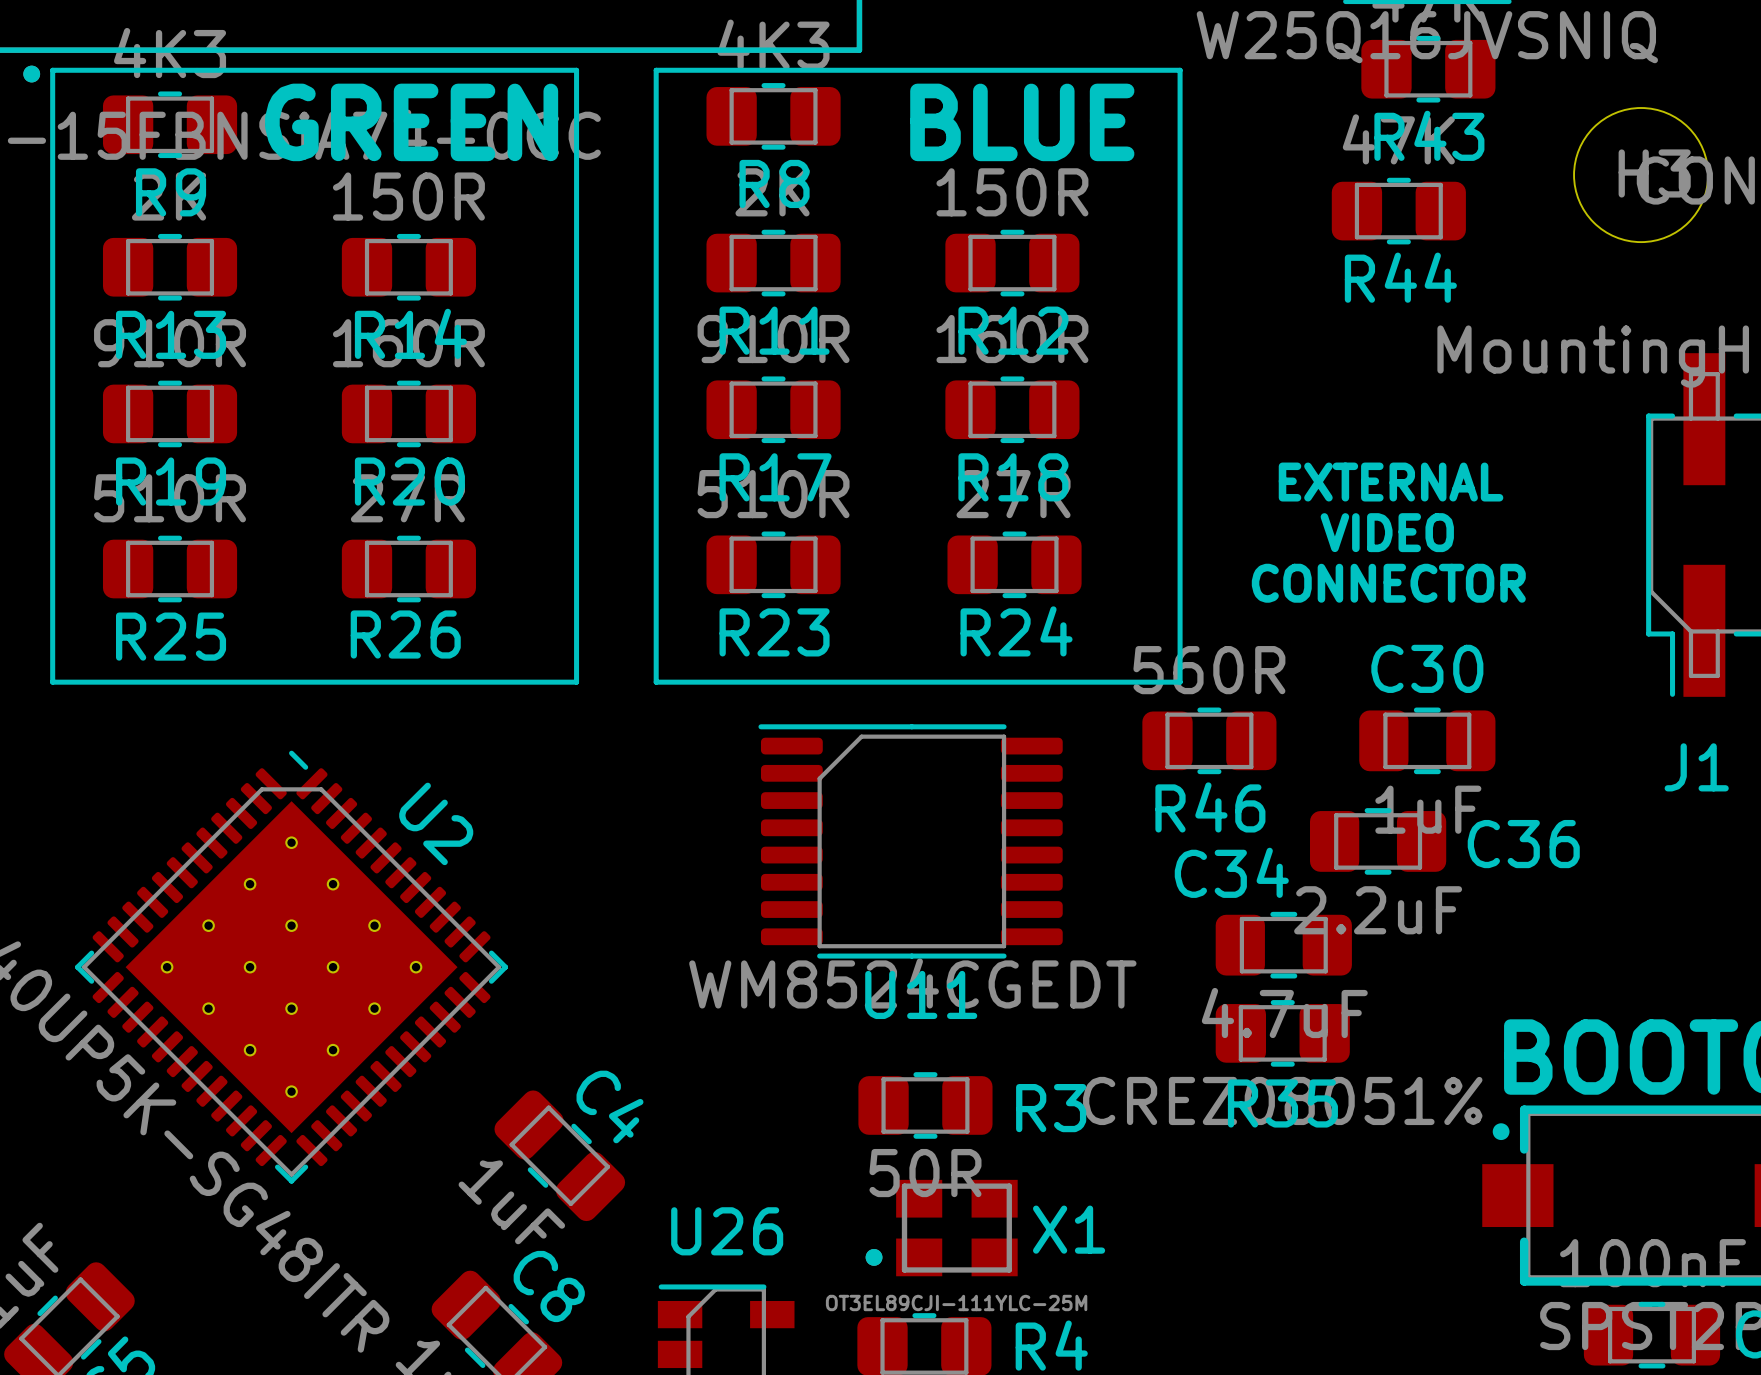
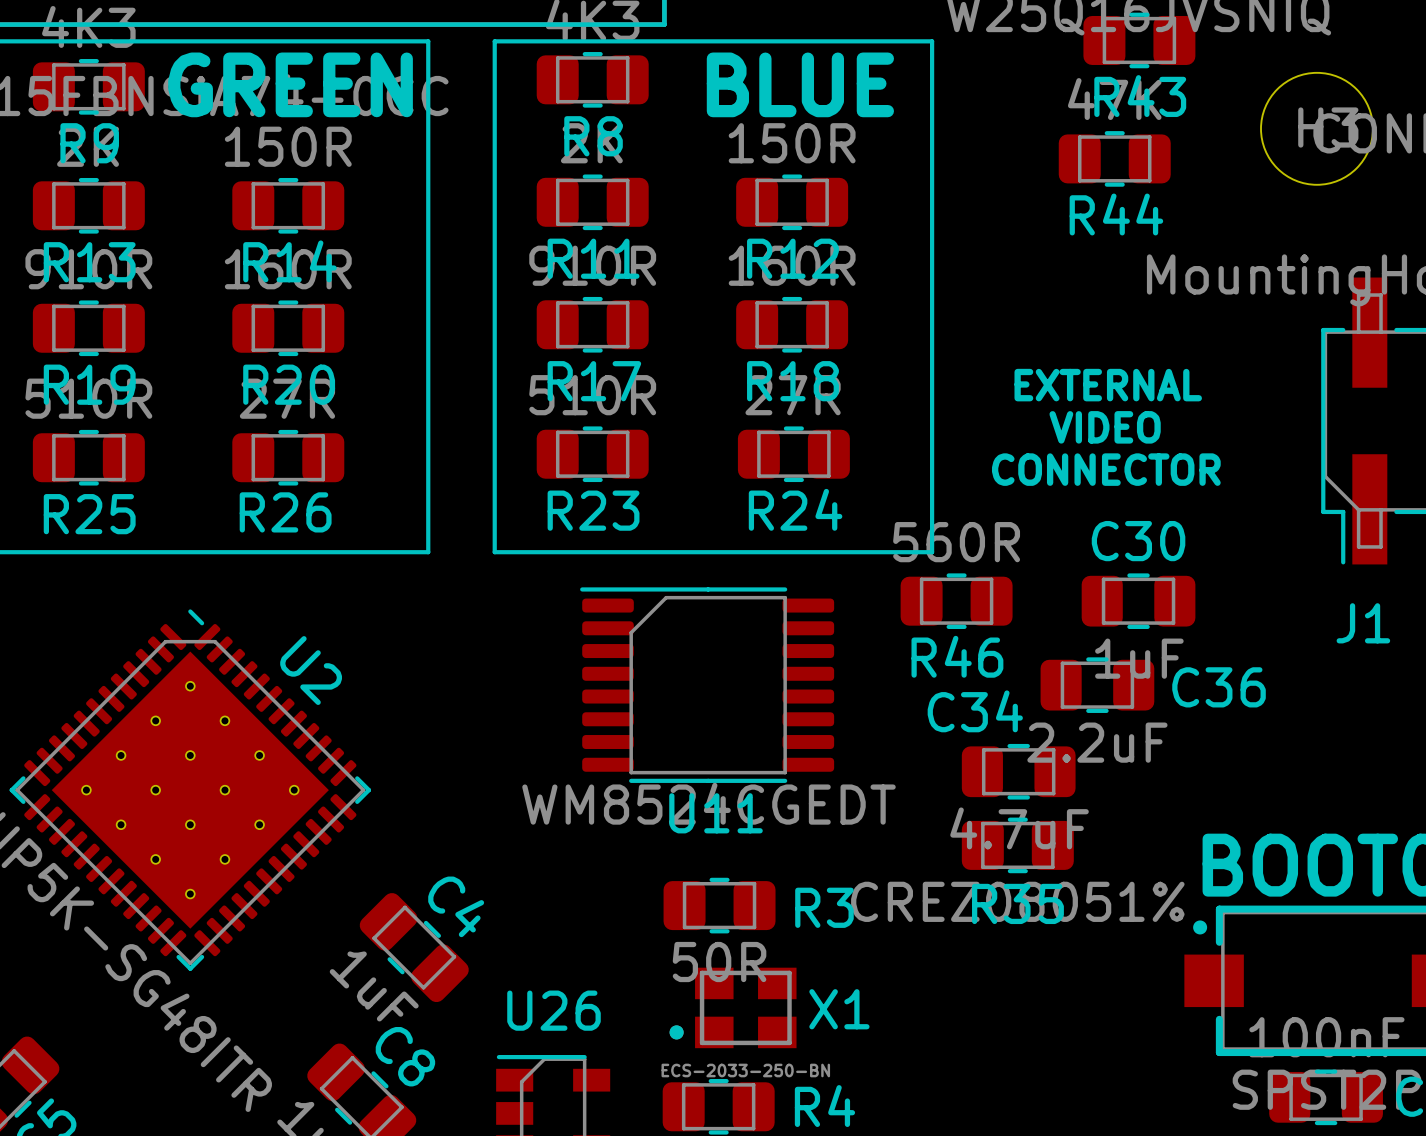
X1 value: OT3EL89CJI-111YLC-25M (956, 1302) -> ECS-2033-250-BN (745, 1070)

